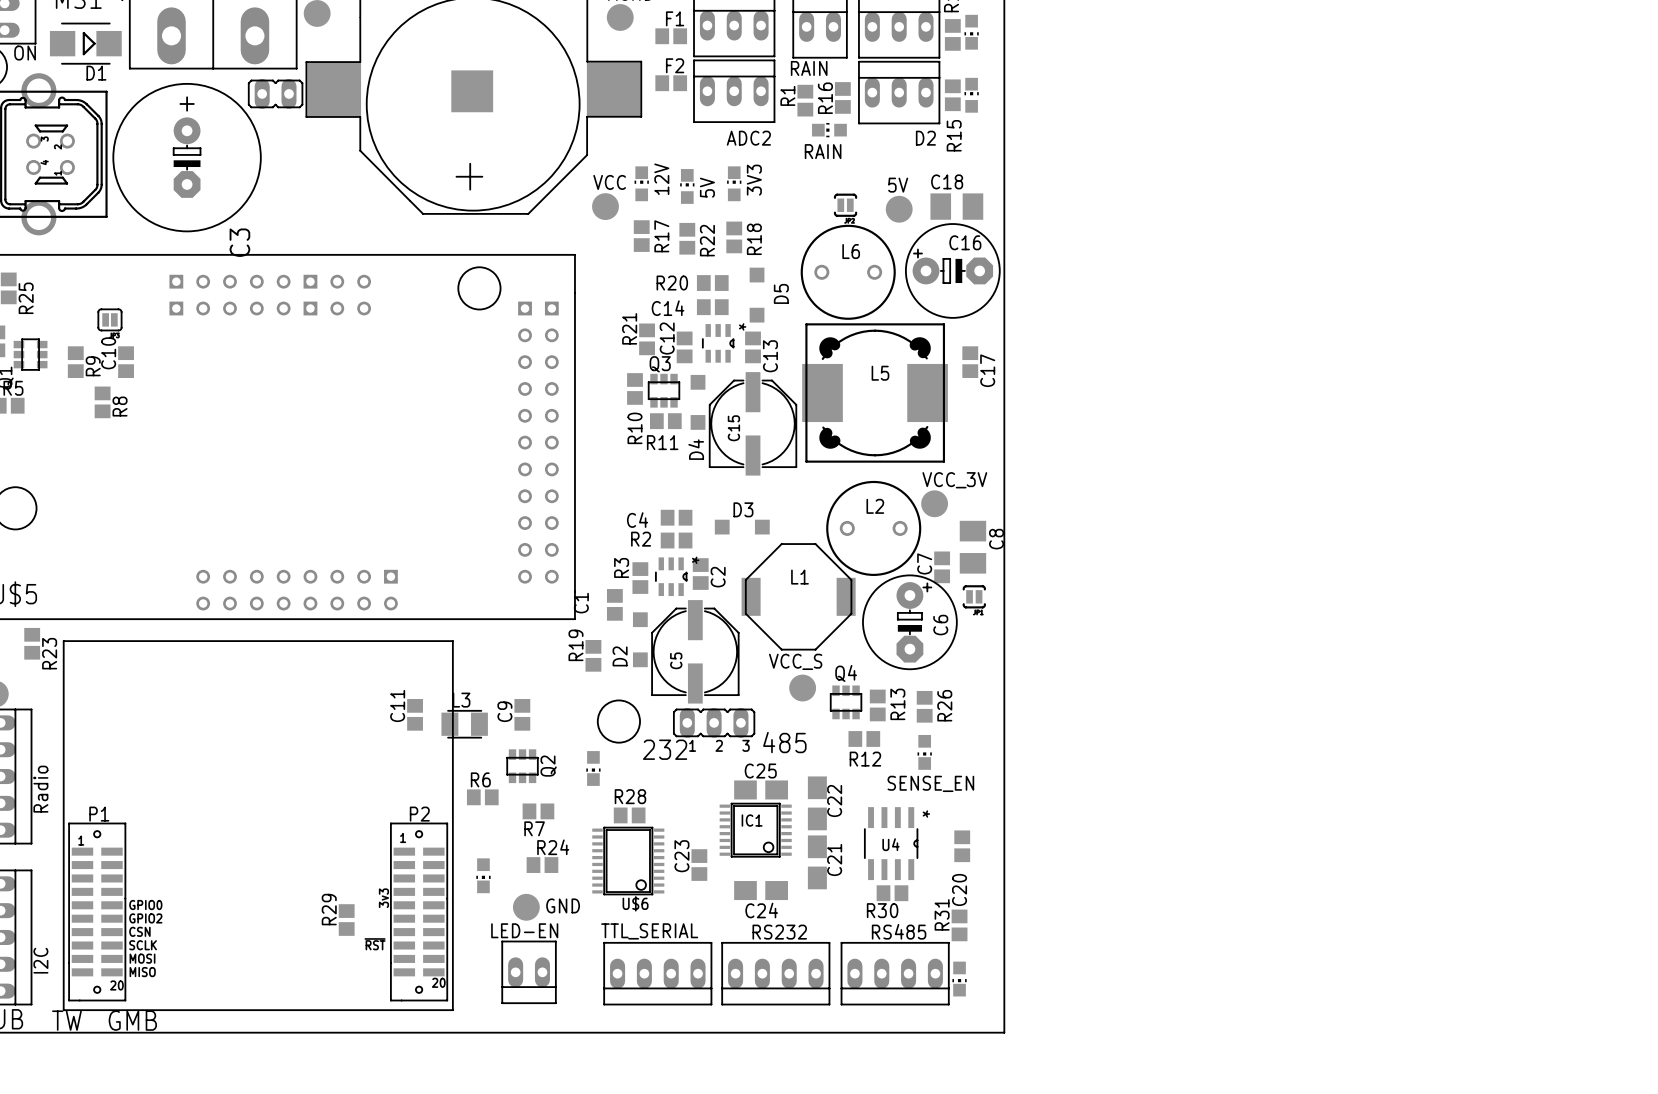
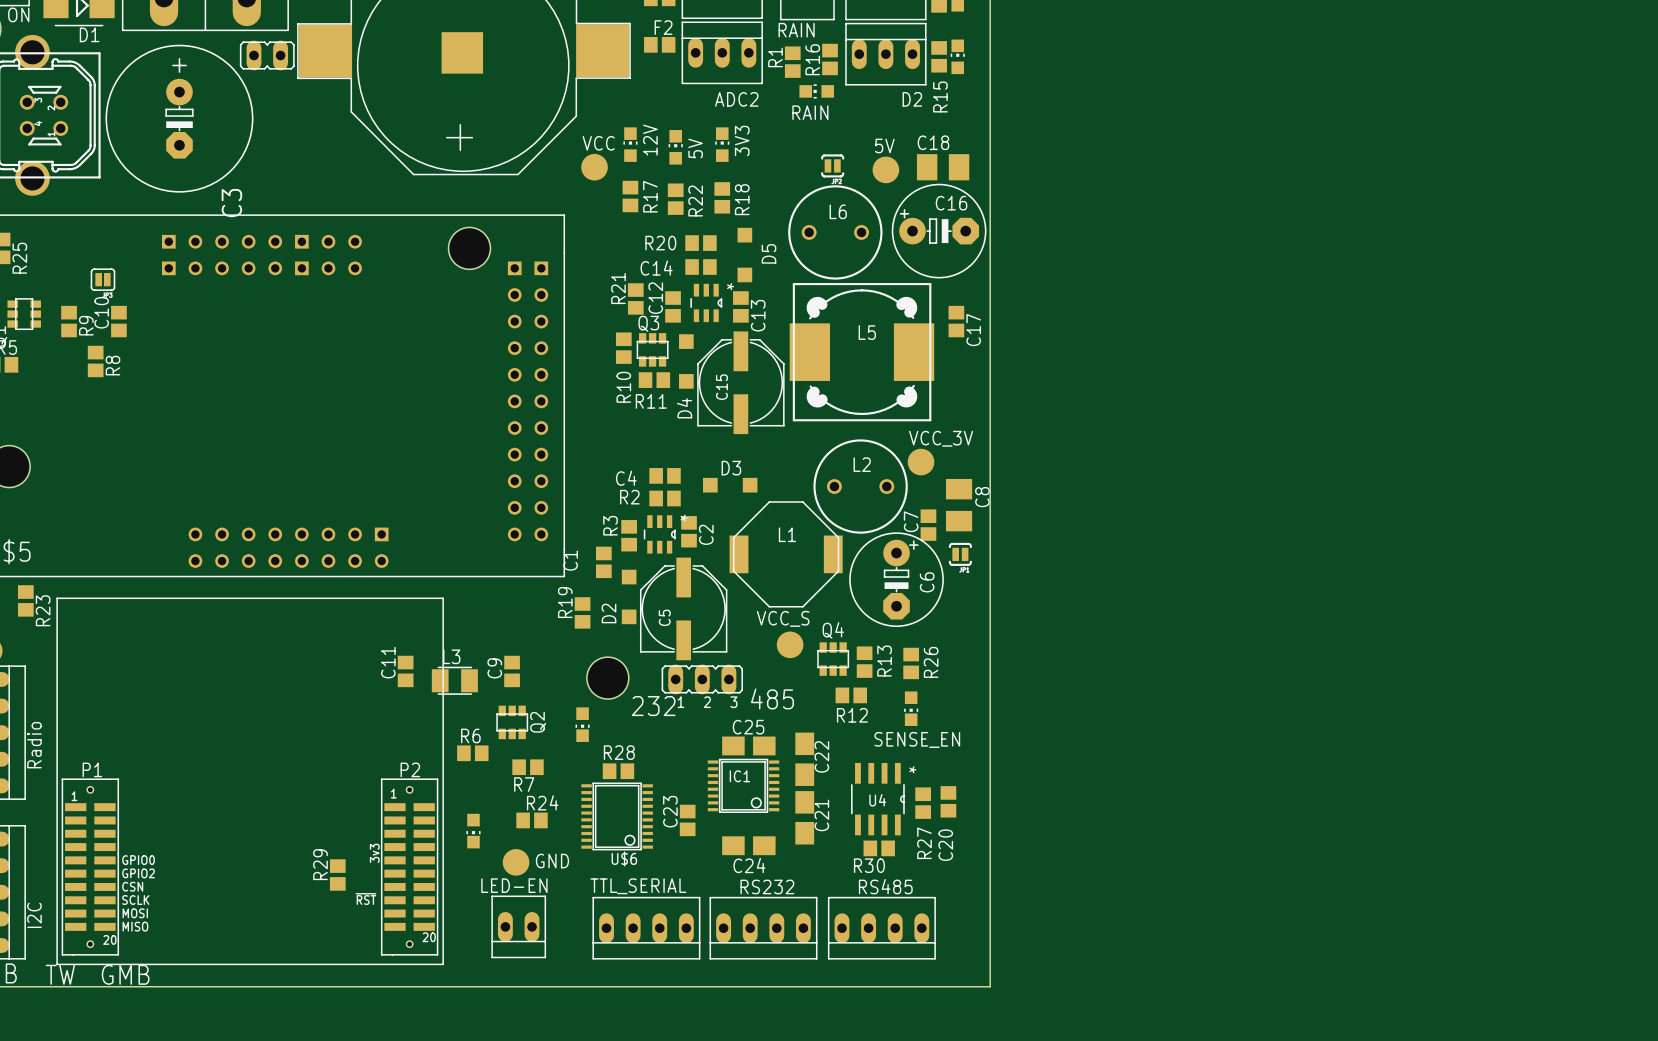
R27: none -> (923, 803)
R31: (959, 925) -> none
part: (959, 979) -> none

